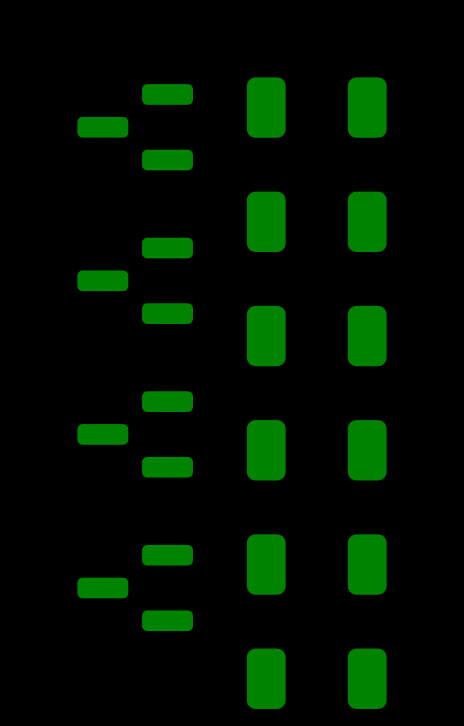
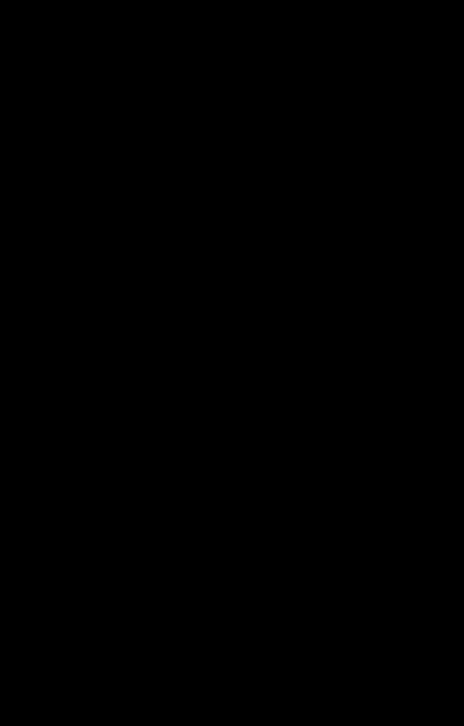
part: (316, 107) -> none
part: (135, 127) -> none
part: (316, 221) -> none
part: (135, 280) -> none
part: (316, 336) -> none
part: (135, 434) -> none
part: (316, 450) -> none
part: (316, 564) -> none
part: (135, 587) -> none
part: (316, 678) -> none

